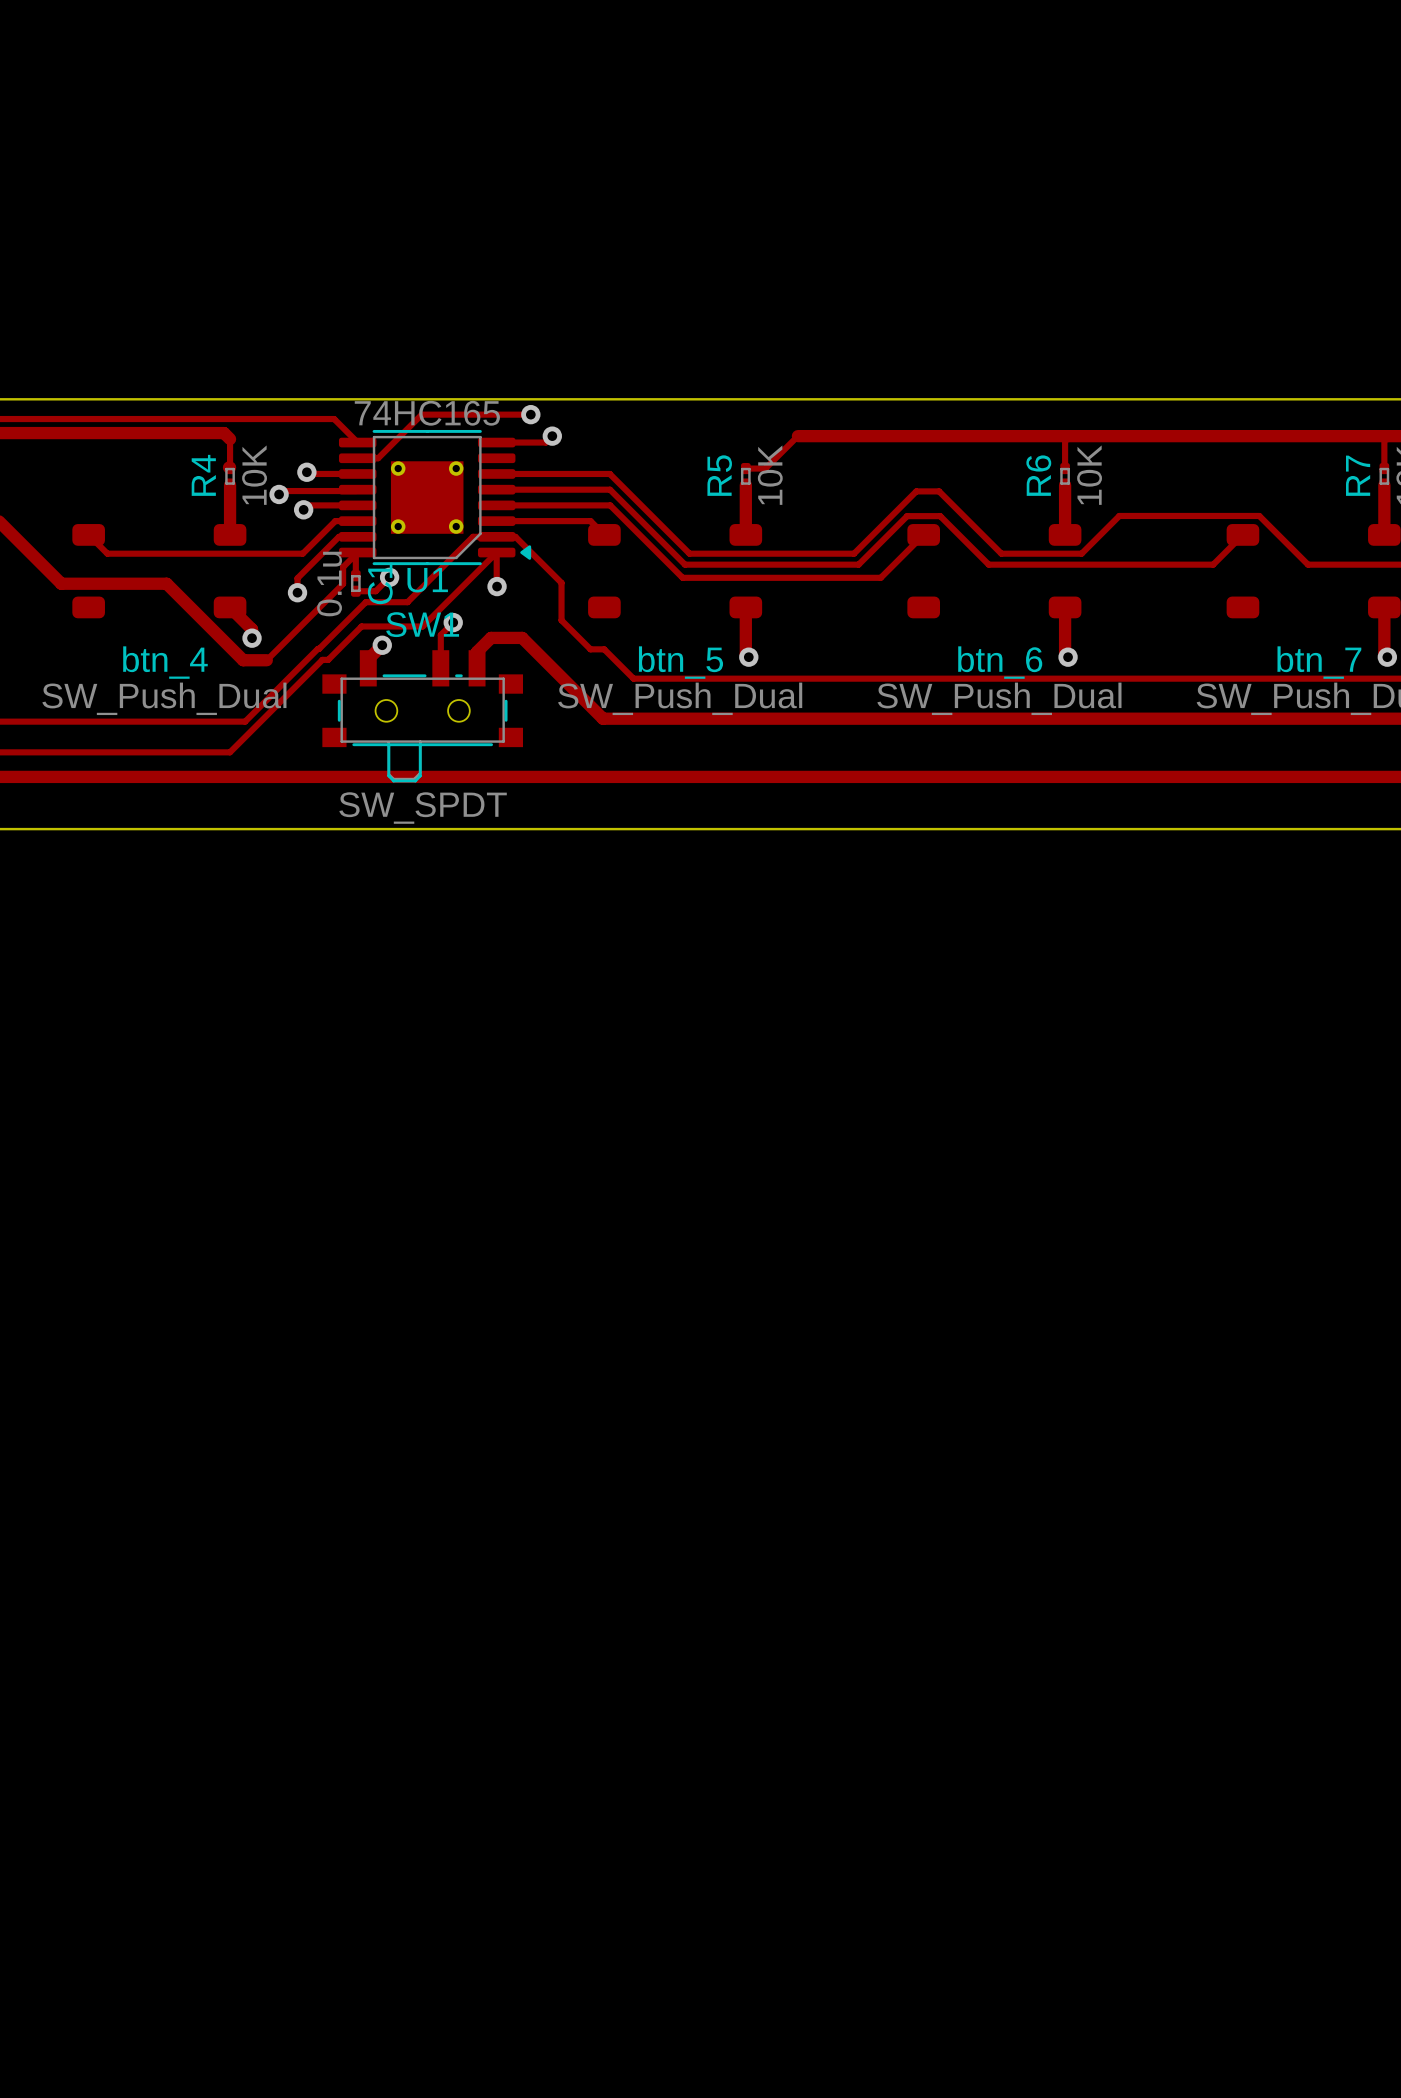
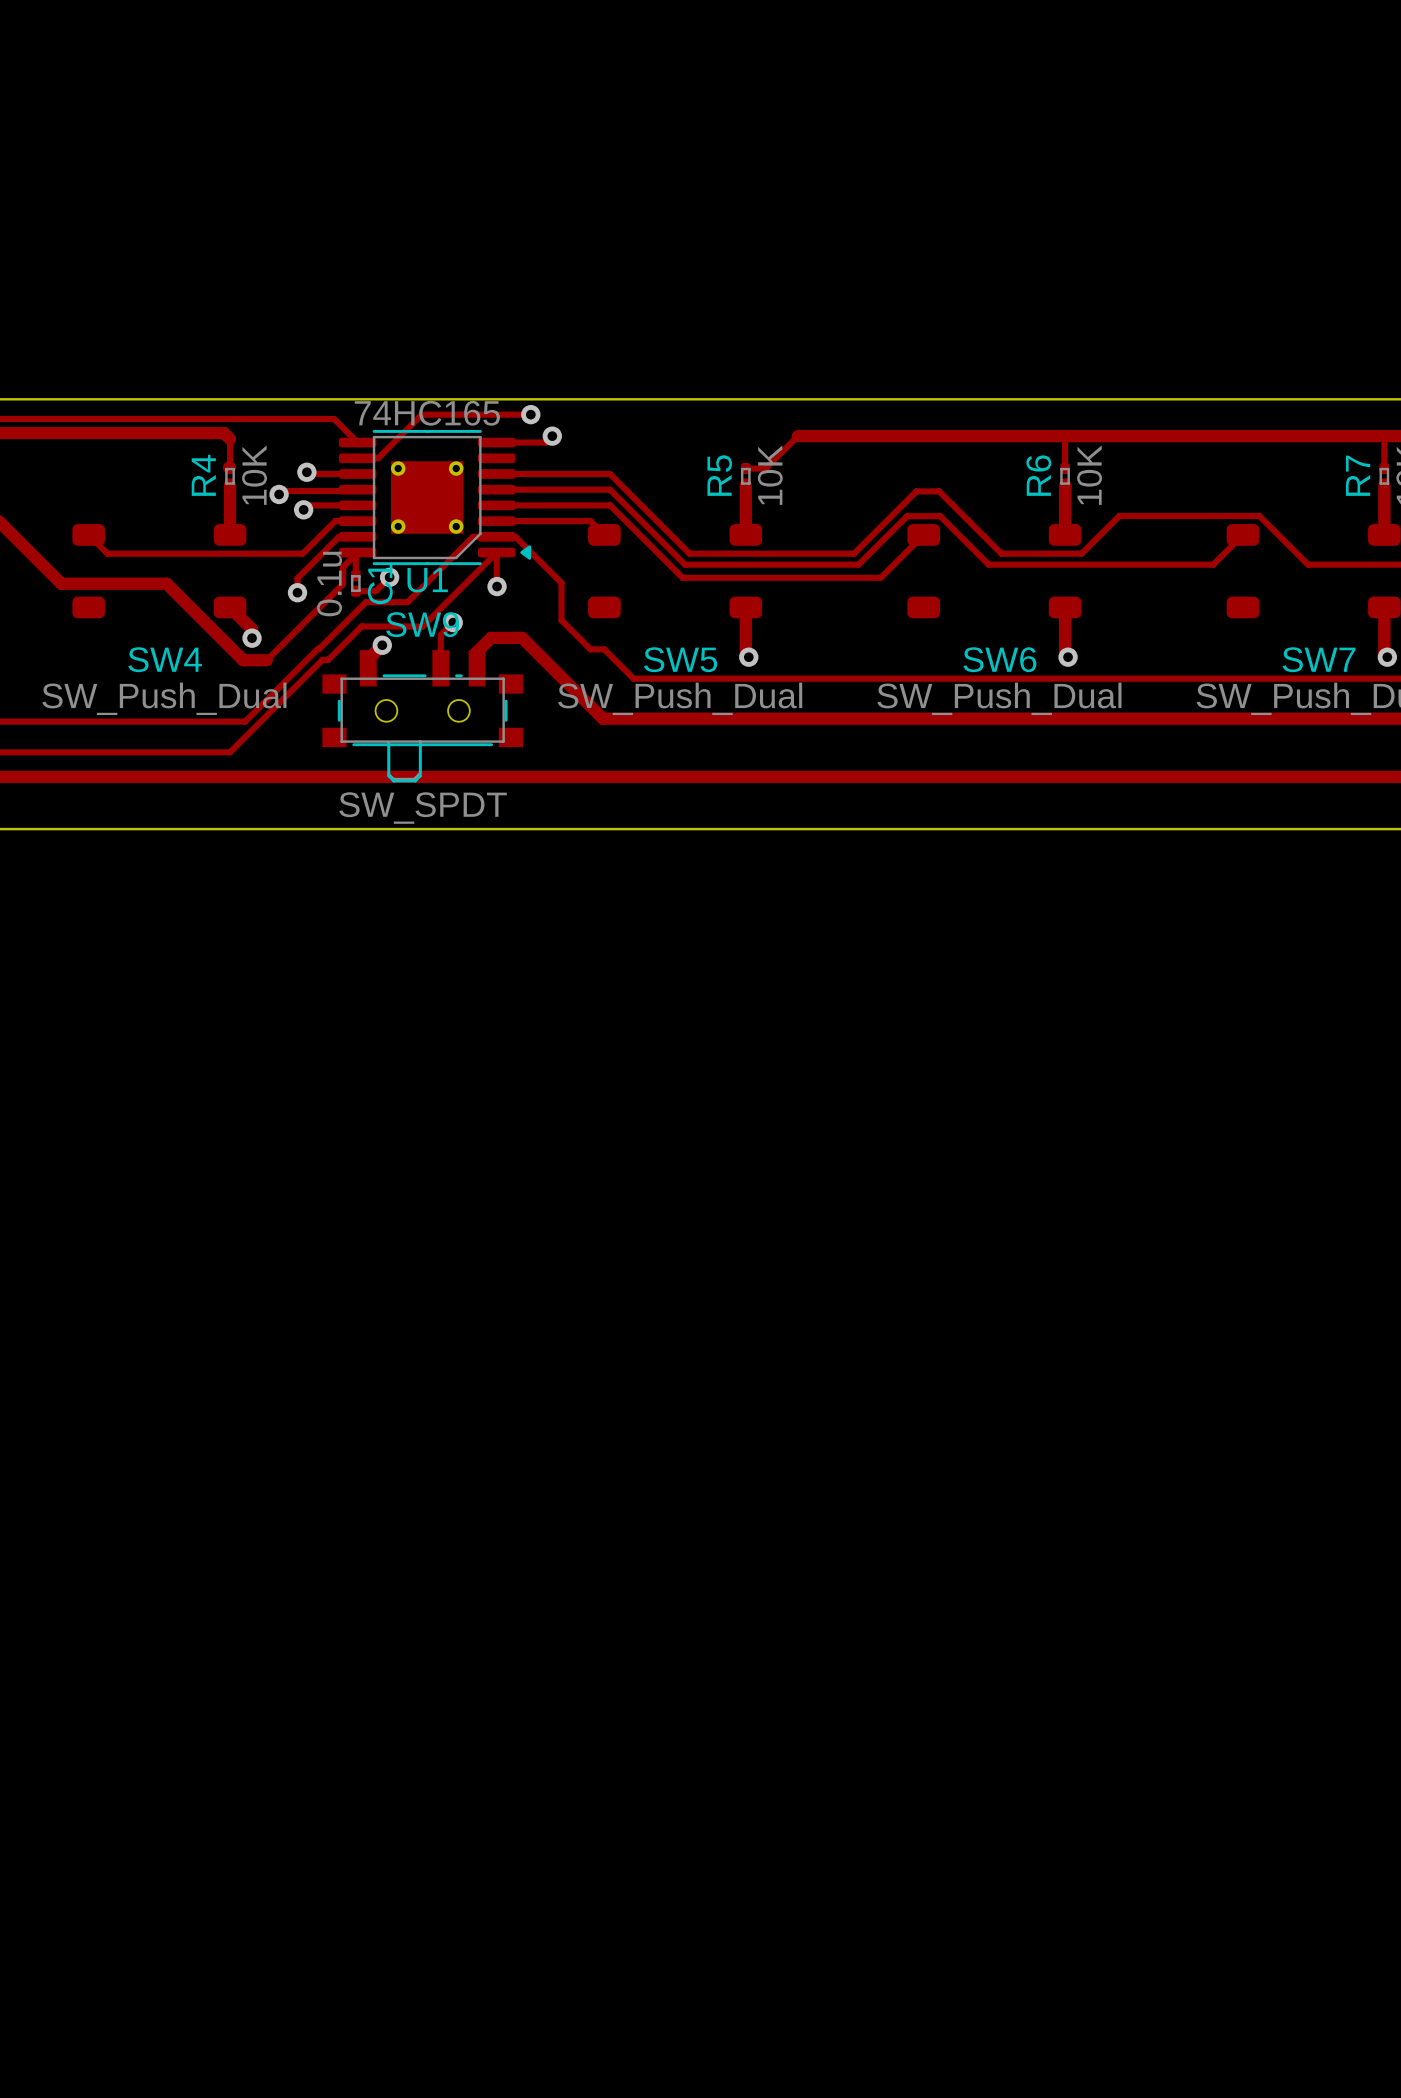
SW1 name: SW1 (422, 624) -> SW9 (422, 624)
btn_4 name: btn_4 (165, 662) -> SW4 (165, 659)
btn_5 name: btn_5 (680, 662) -> SW5 (680, 659)
btn_6 name: btn_6 (1000, 662) -> SW6 (999, 659)
btn_7 name: btn_7 (1319, 662) -> SW7 (1319, 659)

